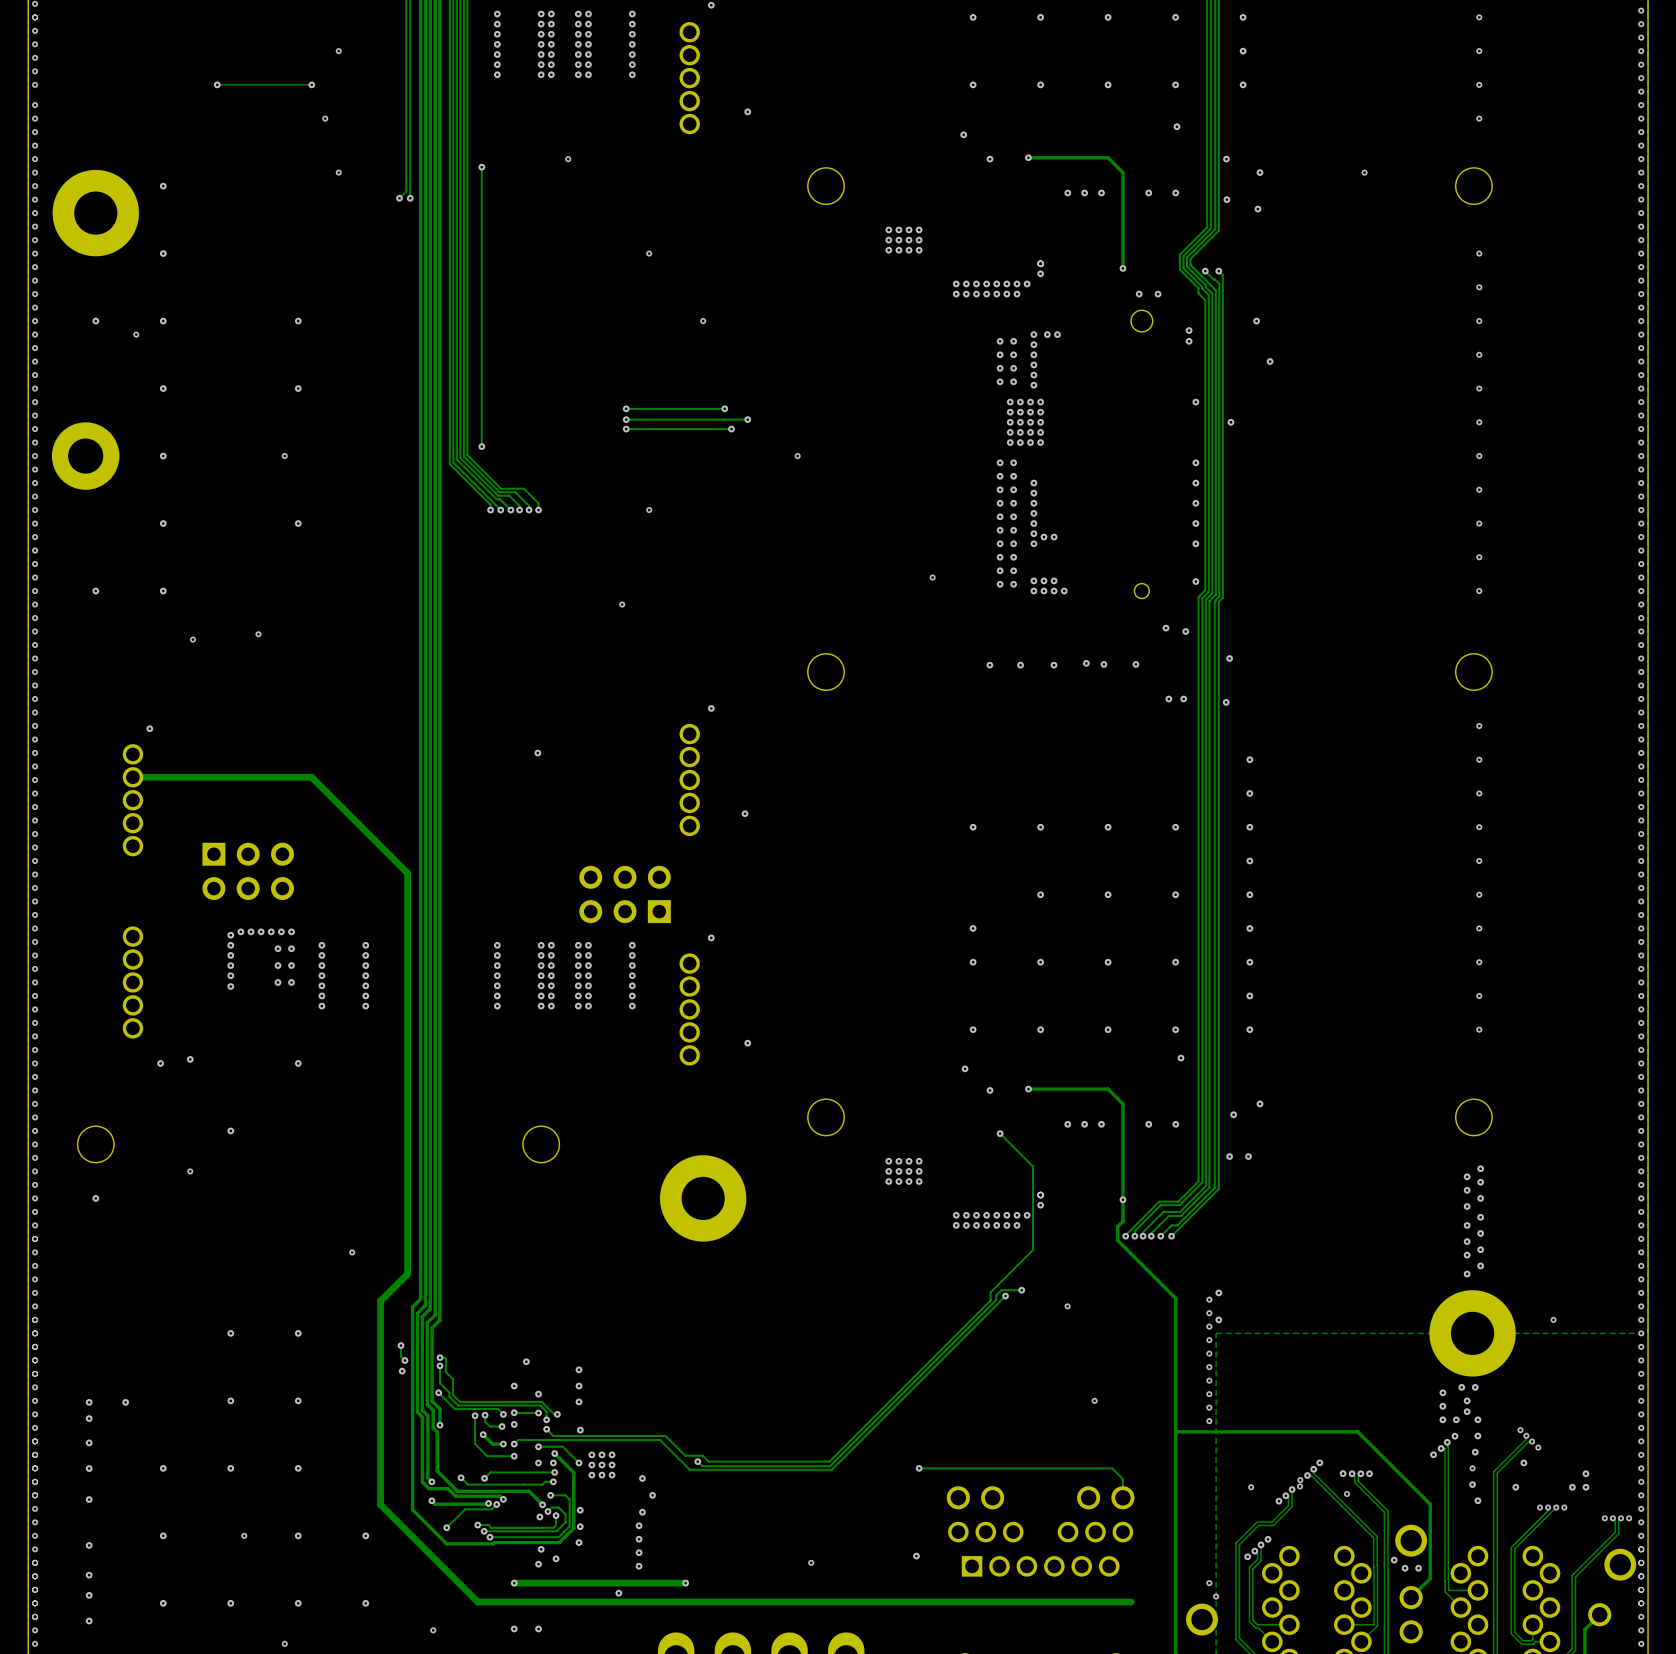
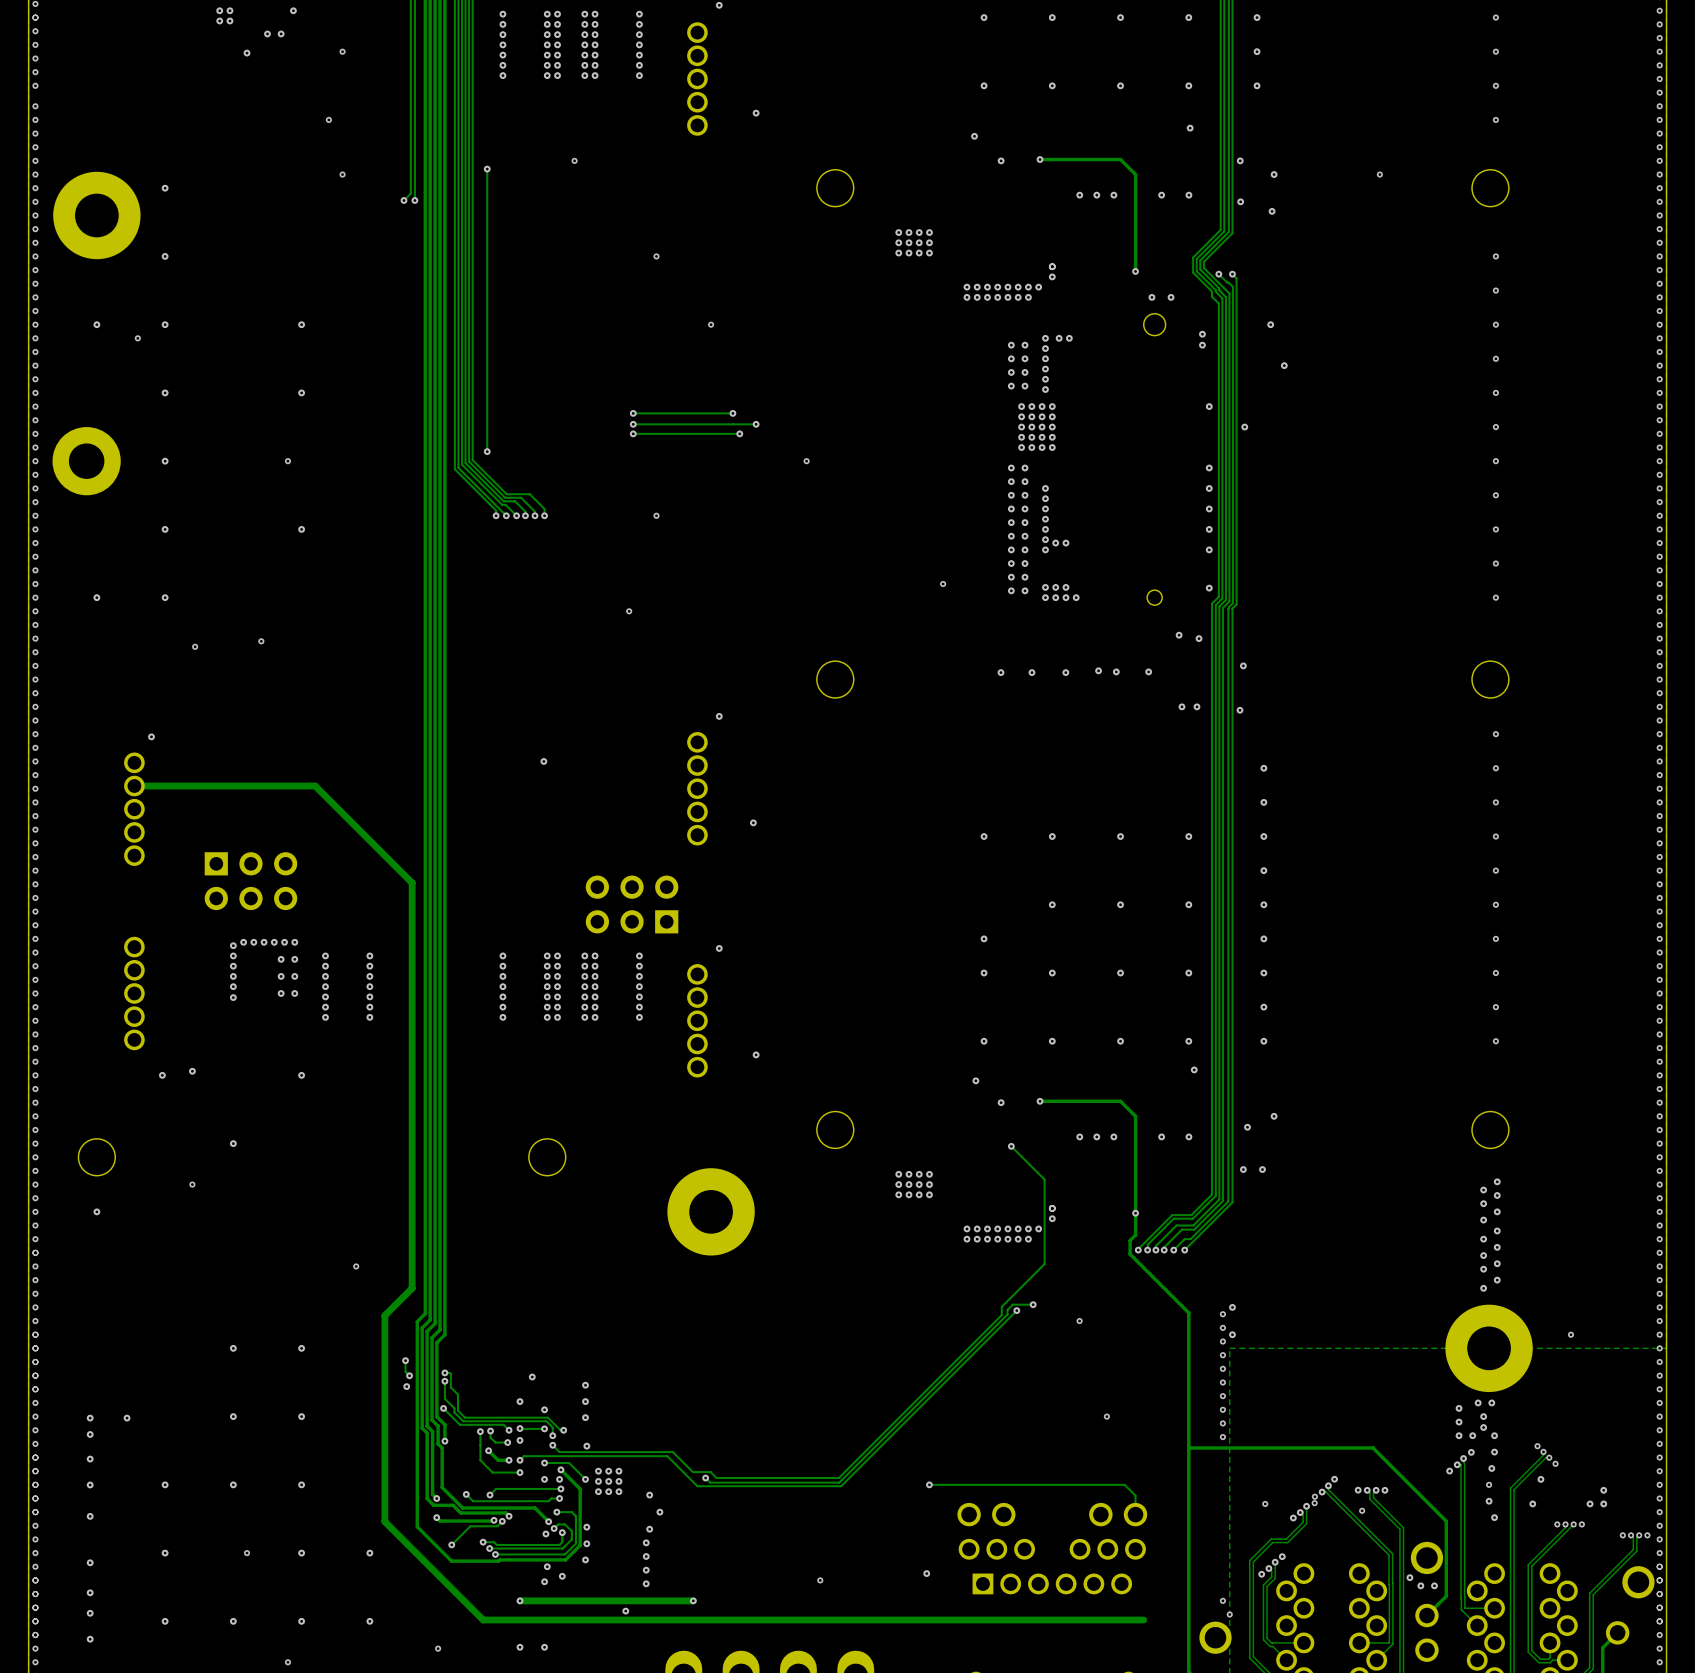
via: none -> (219, 10)
via: none -> (229, 10)
via: none -> (293, 10)
via: none -> (219, 20)
via: none -> (229, 20)
via: none -> (267, 33)
via: none -> (281, 33)
via: none -> (247, 53)
via: (217, 84) -> none
track: (311, 84) (217, 84) -> none
via: (311, 84) -> none

